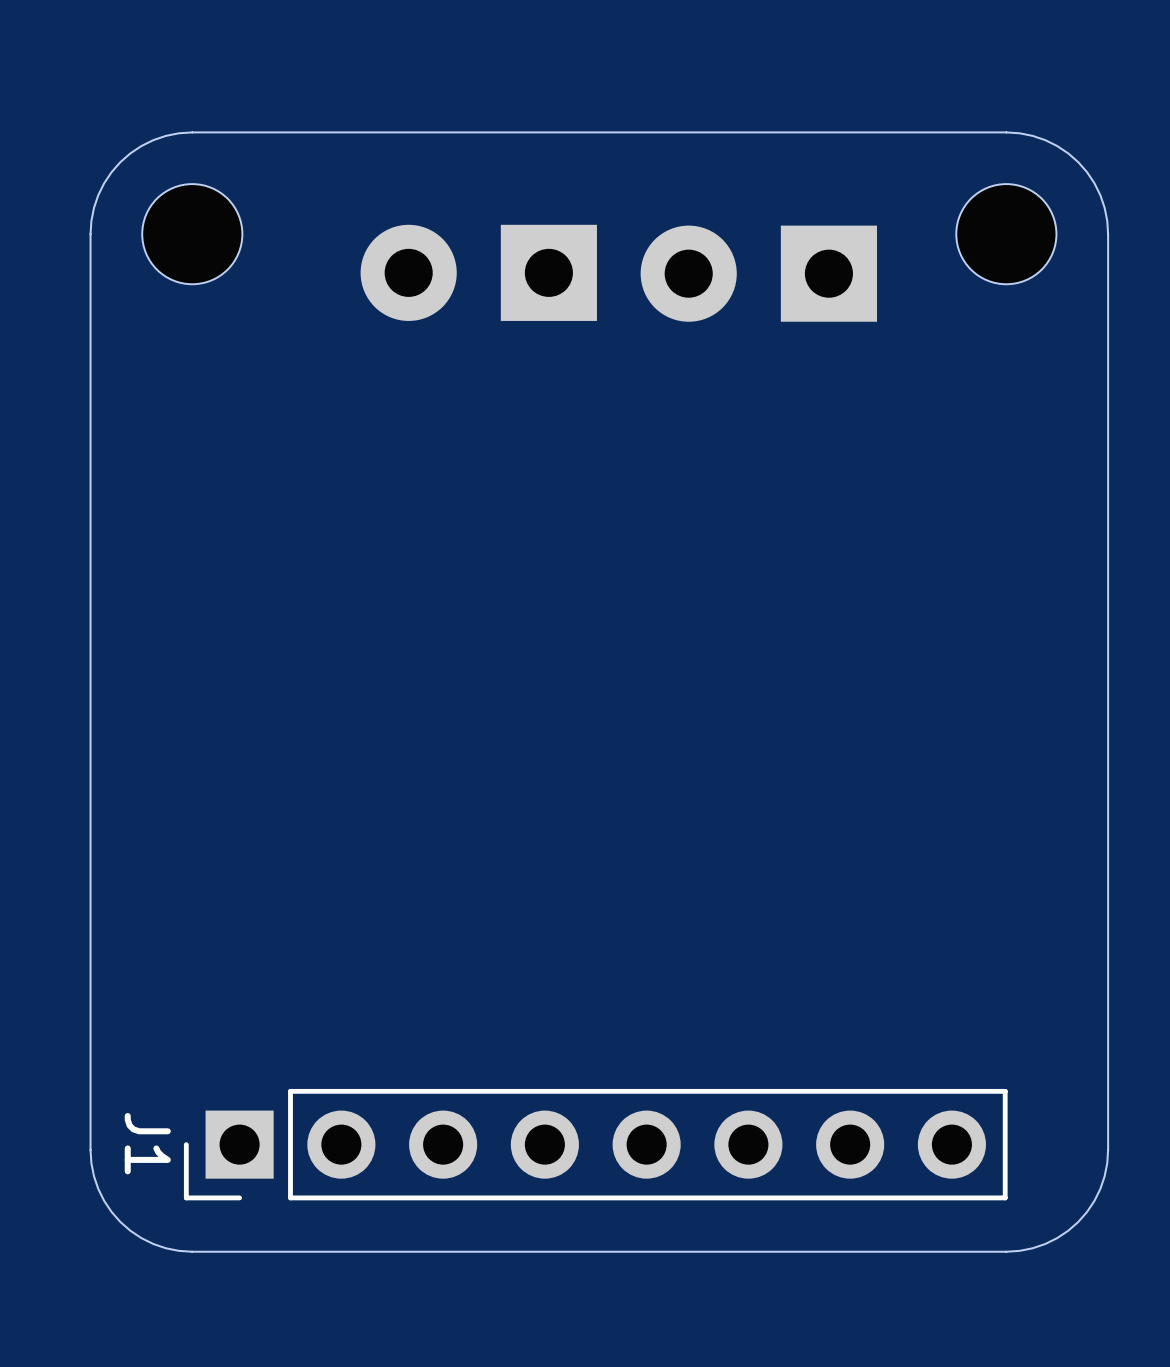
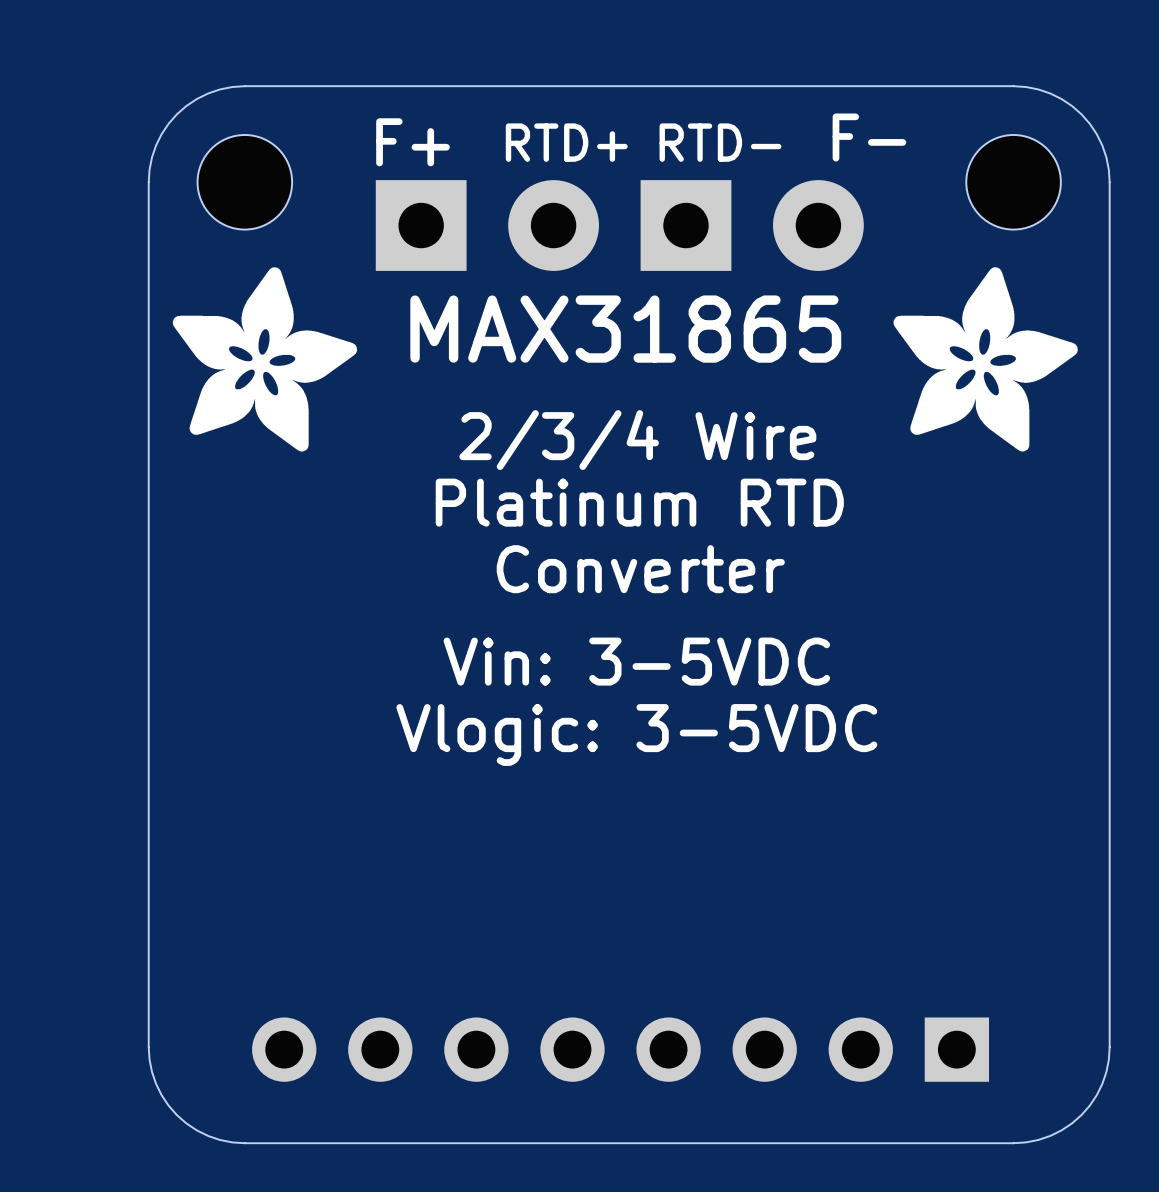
text: none -> F- (869, 137)
text: none -> F+ (412, 142)
text: none -> RTD+ (566, 142)
text: none -> RTD- (720, 142)
part rotation: 0° (478, 272) -> 180° (487, 225)
part rotation: 0° (758, 273) -> 180° (752, 225)
drawing: none -> [172, 267, 358, 452]
drawing: none -> [893, 267, 1078, 452]
text: none -> MAX31865 (625, 329)
text: none -> 2/3/4 Wire (637, 440)
text: none -> Platinum RTD (639, 502)
text: none -> Converter (640, 569)
text: none -> Vin: 3-5VDC (636, 661)
text: none -> Vlogic: 3-5VDC (636, 734)
J1: (595, 1144) -> none
part: none -> (620, 1049)

